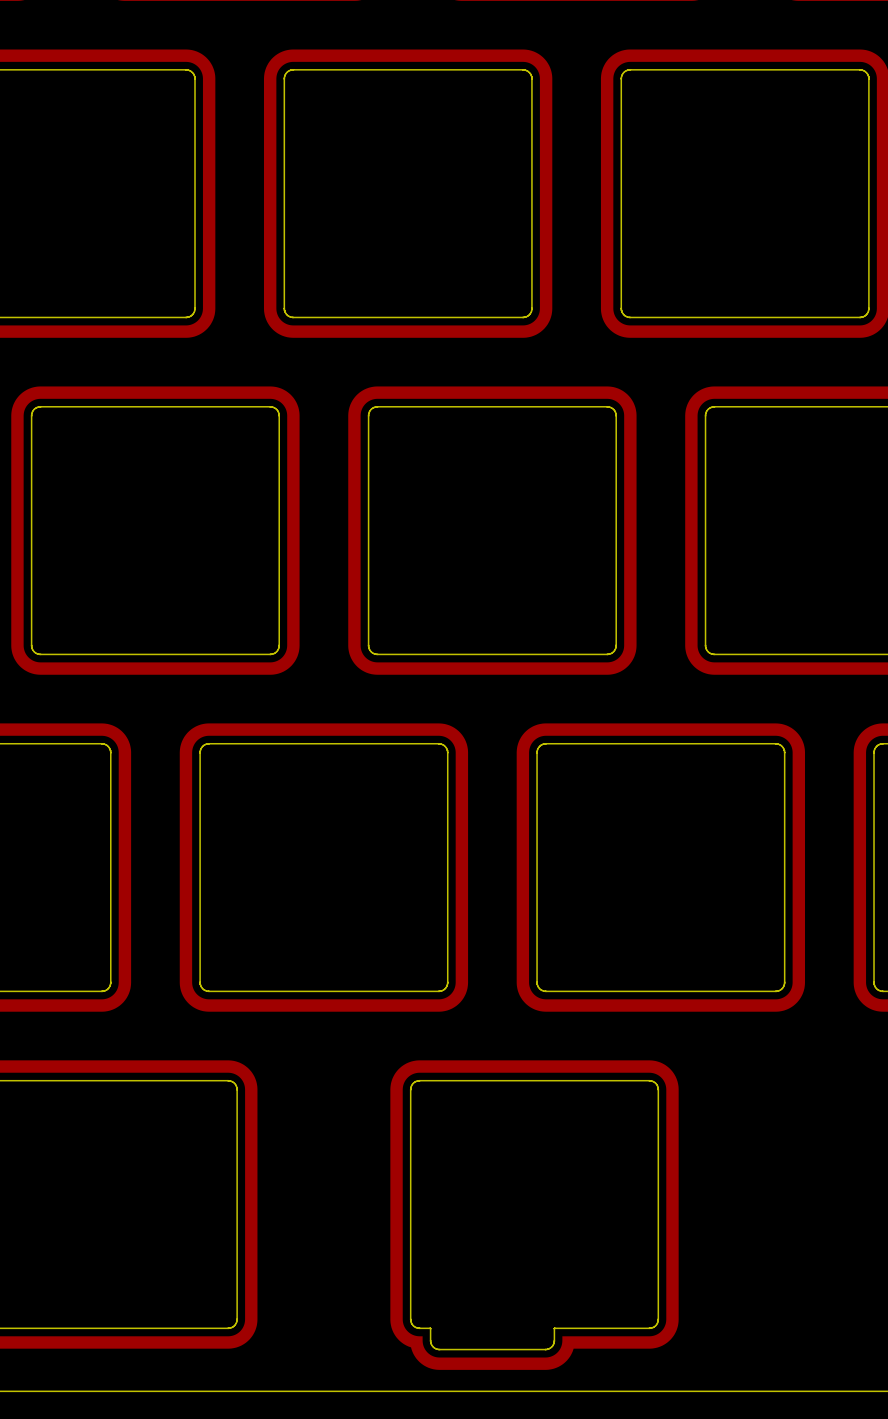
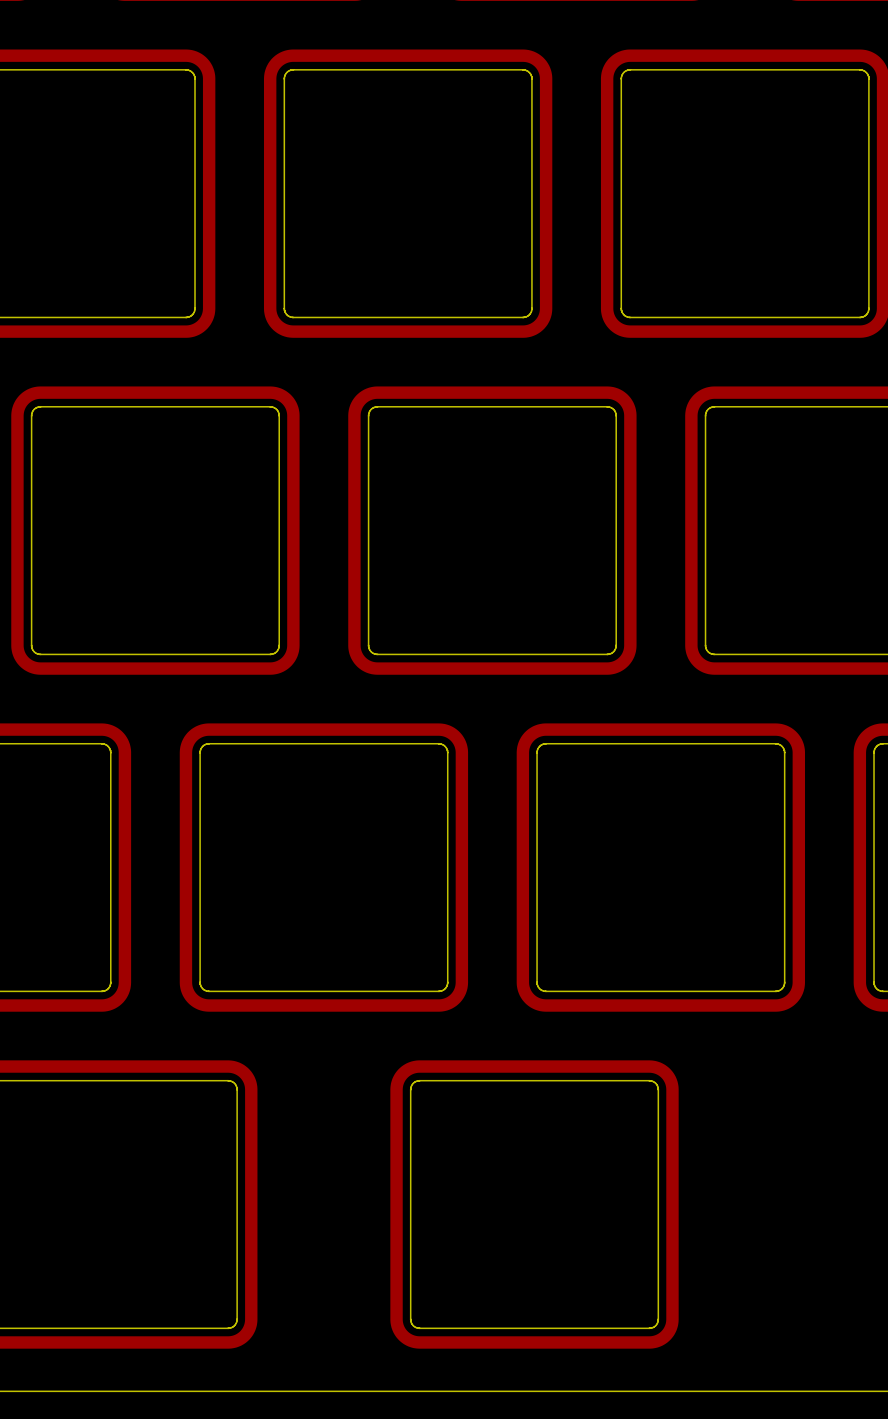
drawing shape: [390, 1060, 679, 1370] -> [390, 1060, 679, 1349]
board edge: (430, 1328) (430, 1341) -> none
board edge: none -> (430, 1328) (555, 1328)
board edge: (554, 1328) (554, 1343) (547, 1349) -> none
board edge: (430, 1342) (434, 1347) (439, 1349) (545, 1349) -> none

